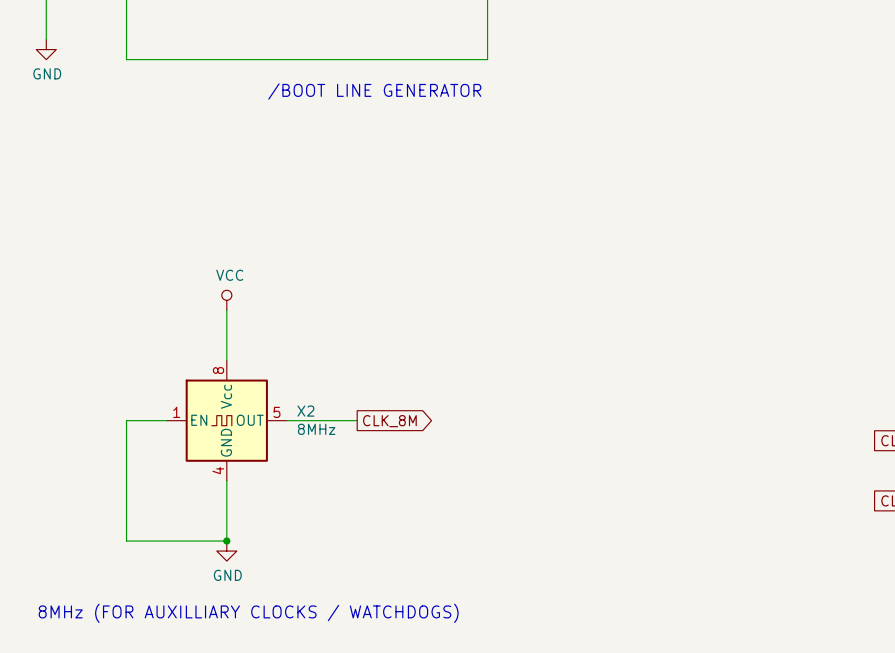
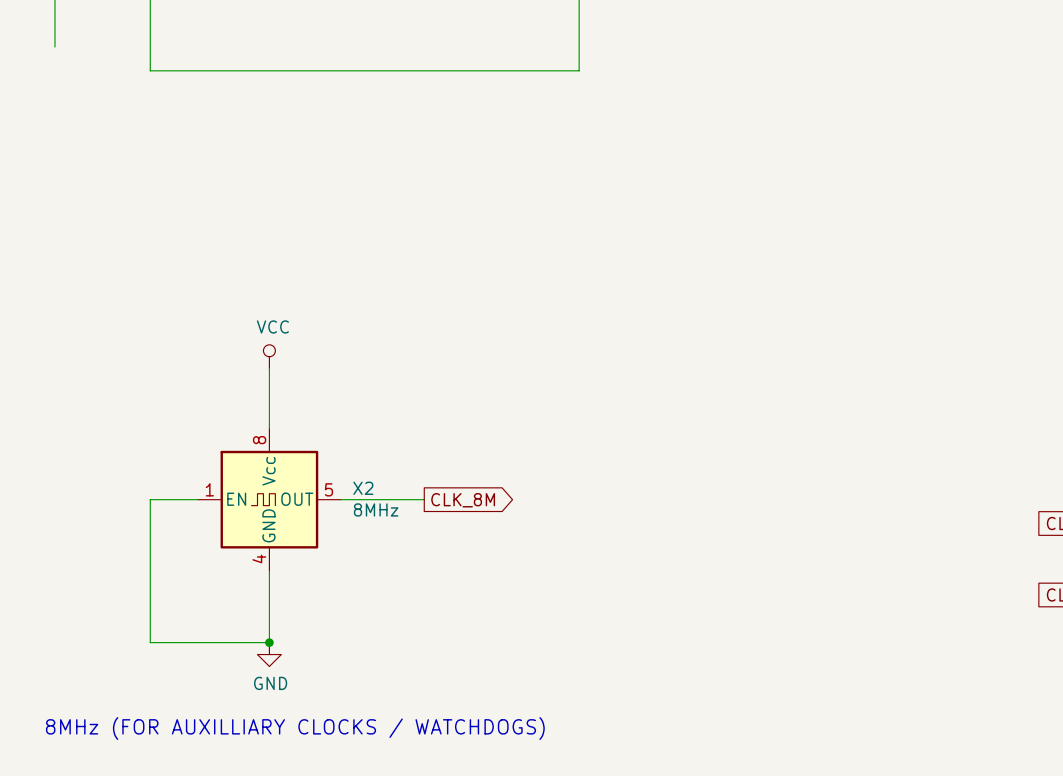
power symbol: GND (46, 49) -> none
text: /BOOT LINE GENERATOR (374, 91) -> none

